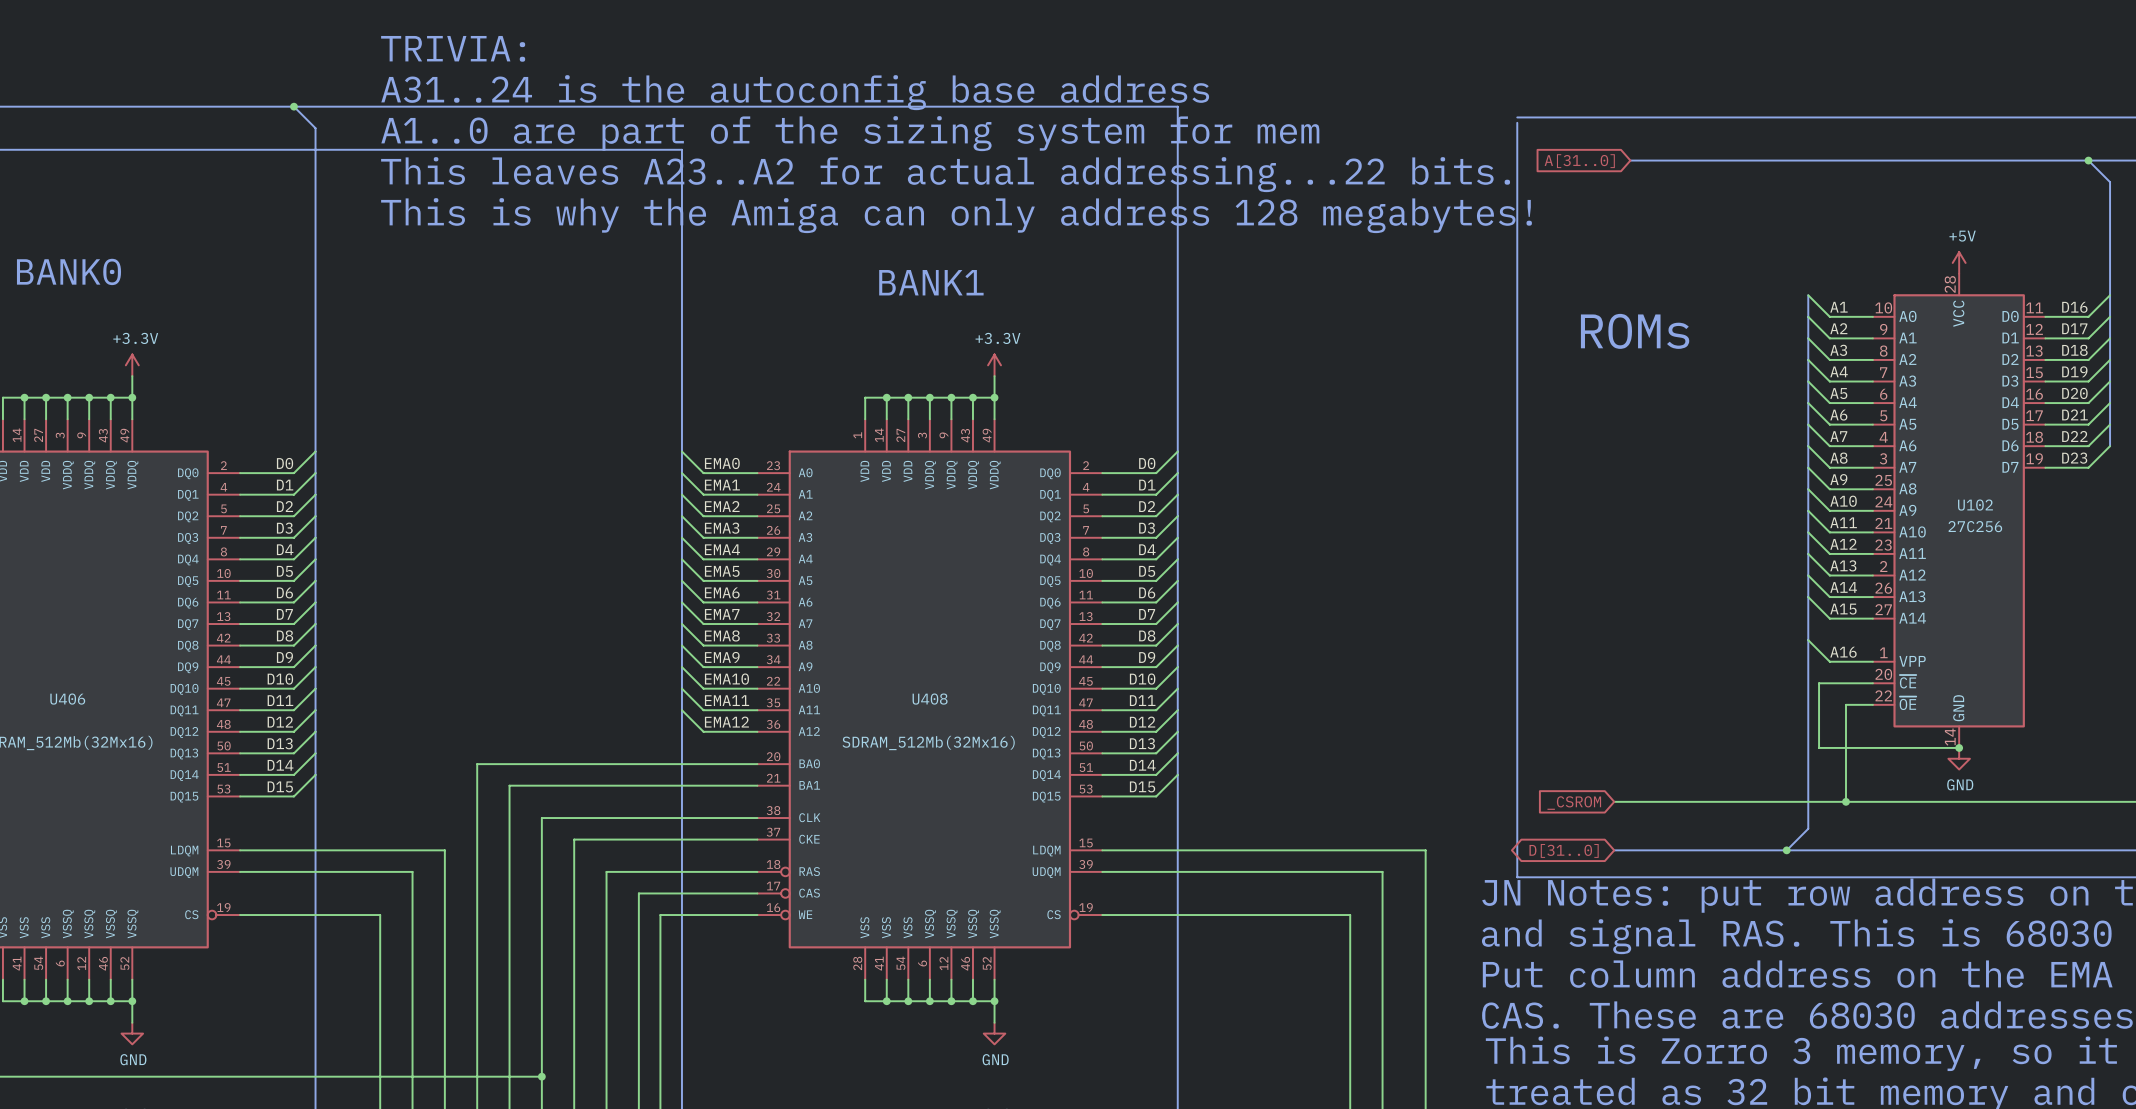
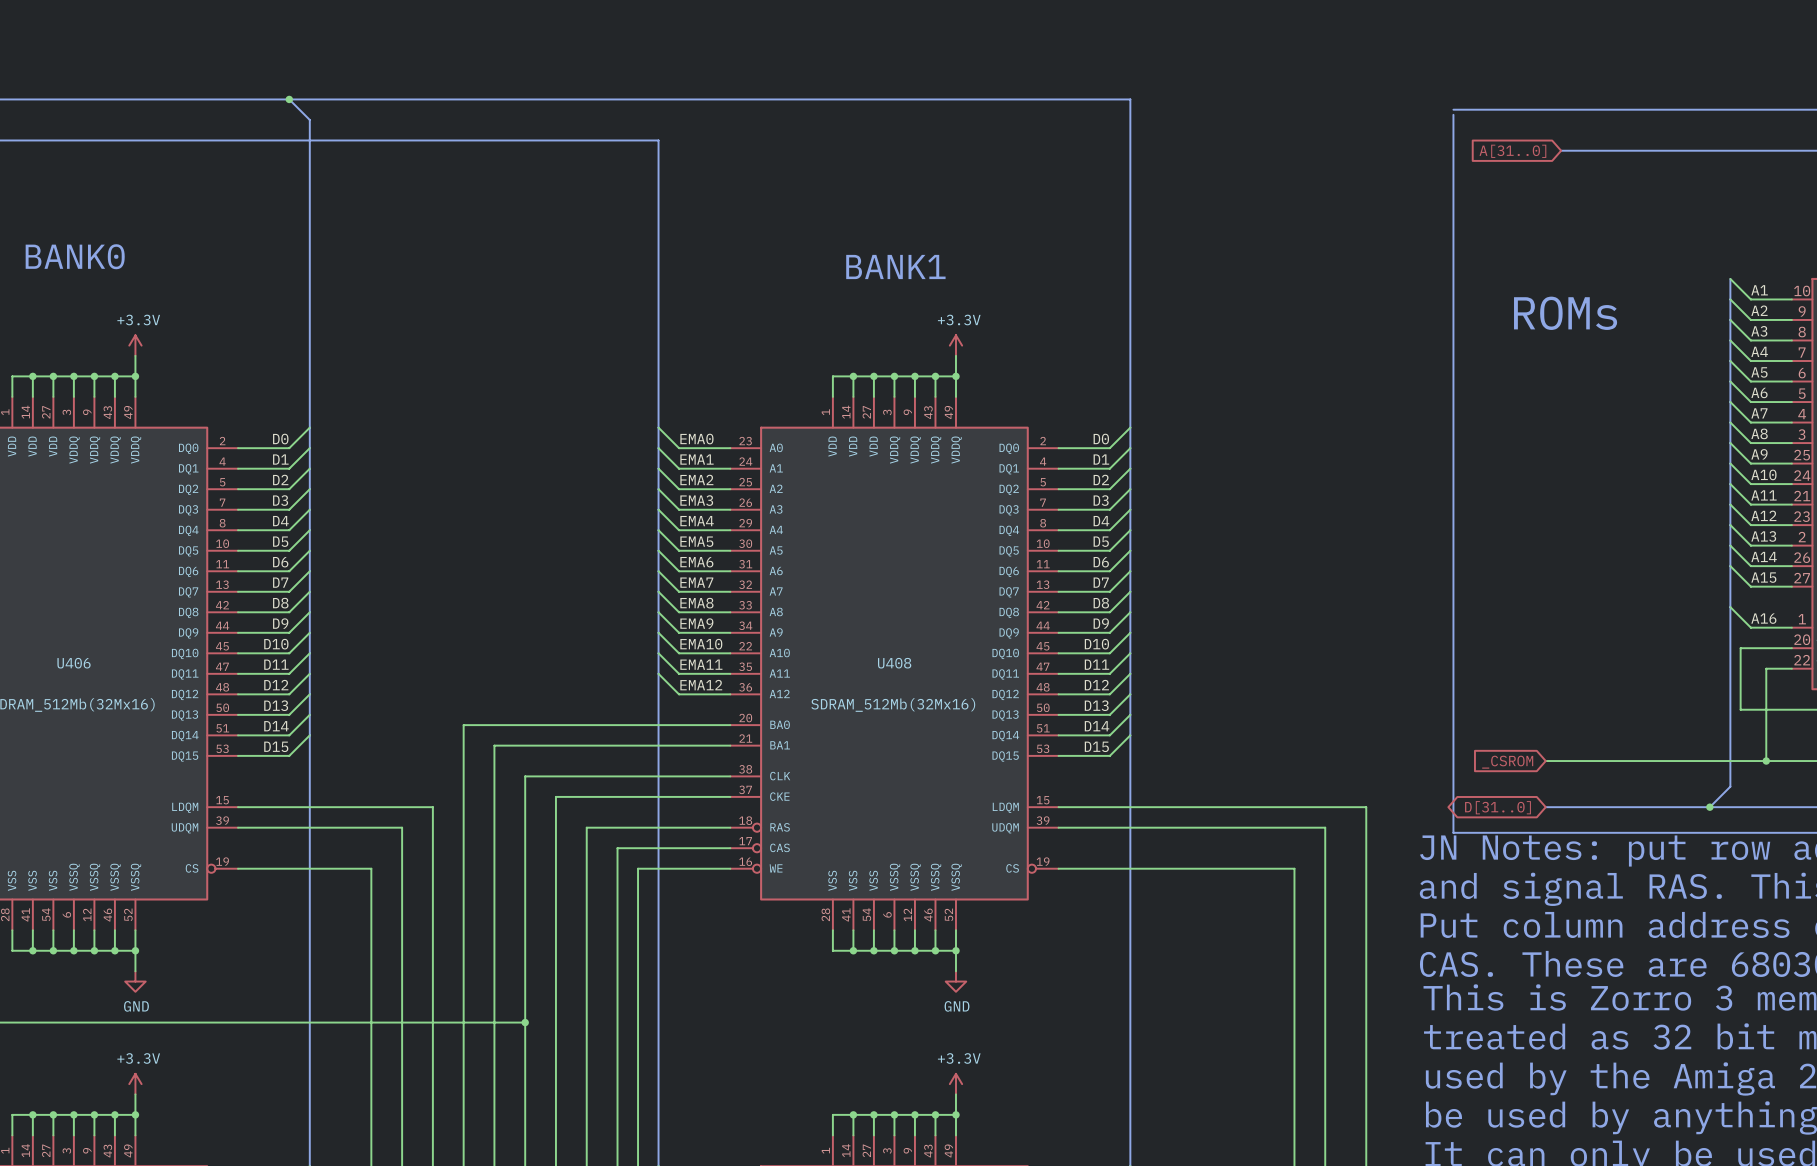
text: TRIVIA: (453, 48) -> none
text: A31..24 is the autoconfig base address (795, 92) -> none
text: A1..0 are part of the sizing system for mem (850, 133) -> none
text: This leaves A23..A2 for actual addressing...22 bits. (945, 174) -> none
text: This is why the Amiga can only address 128 megabytes! (956, 215) -> none

